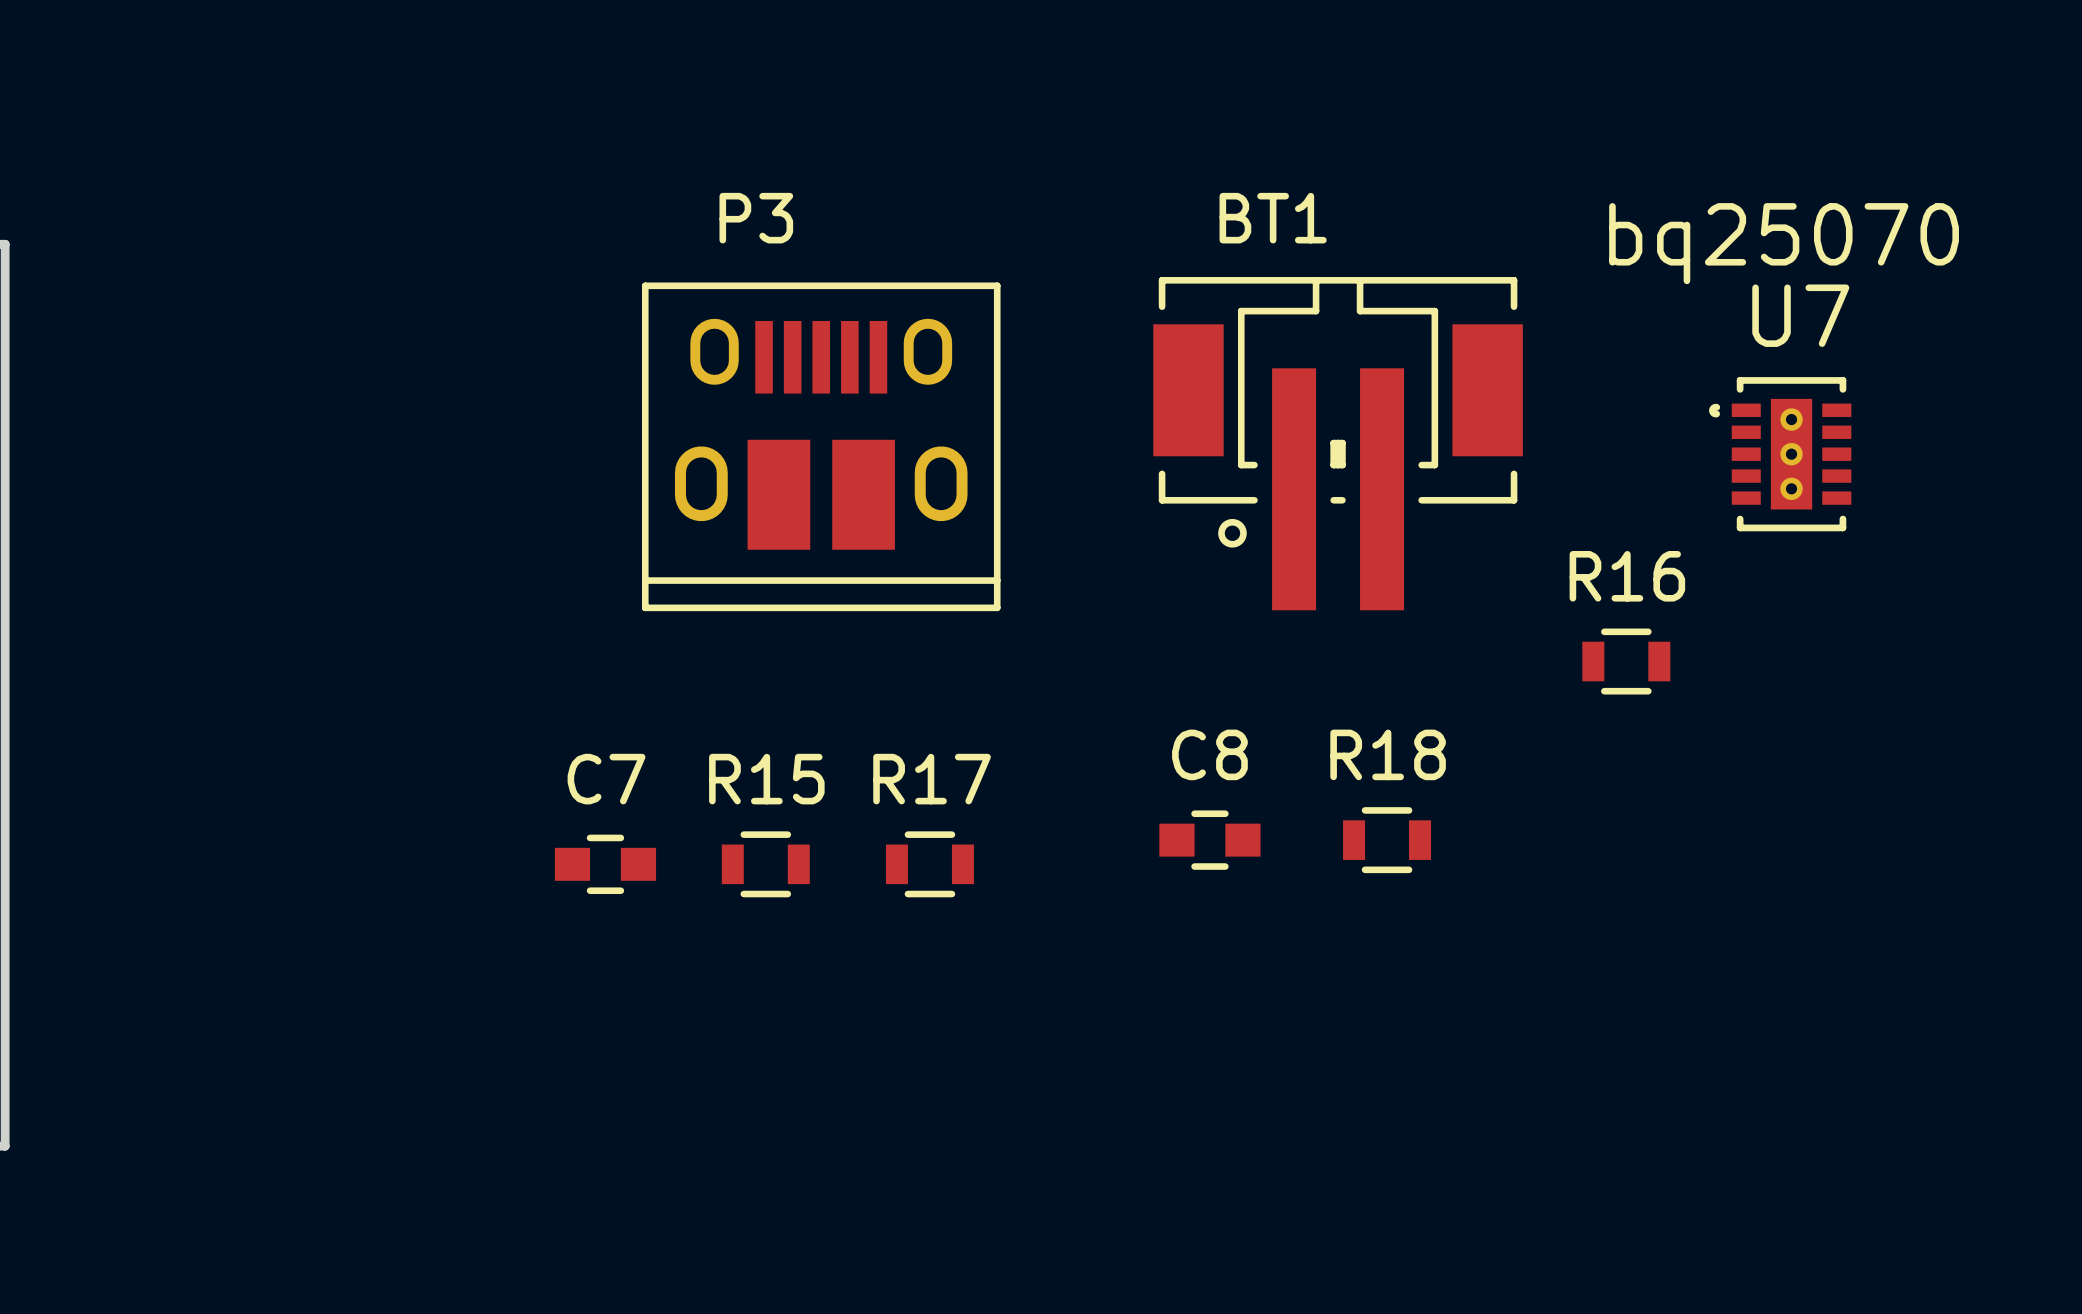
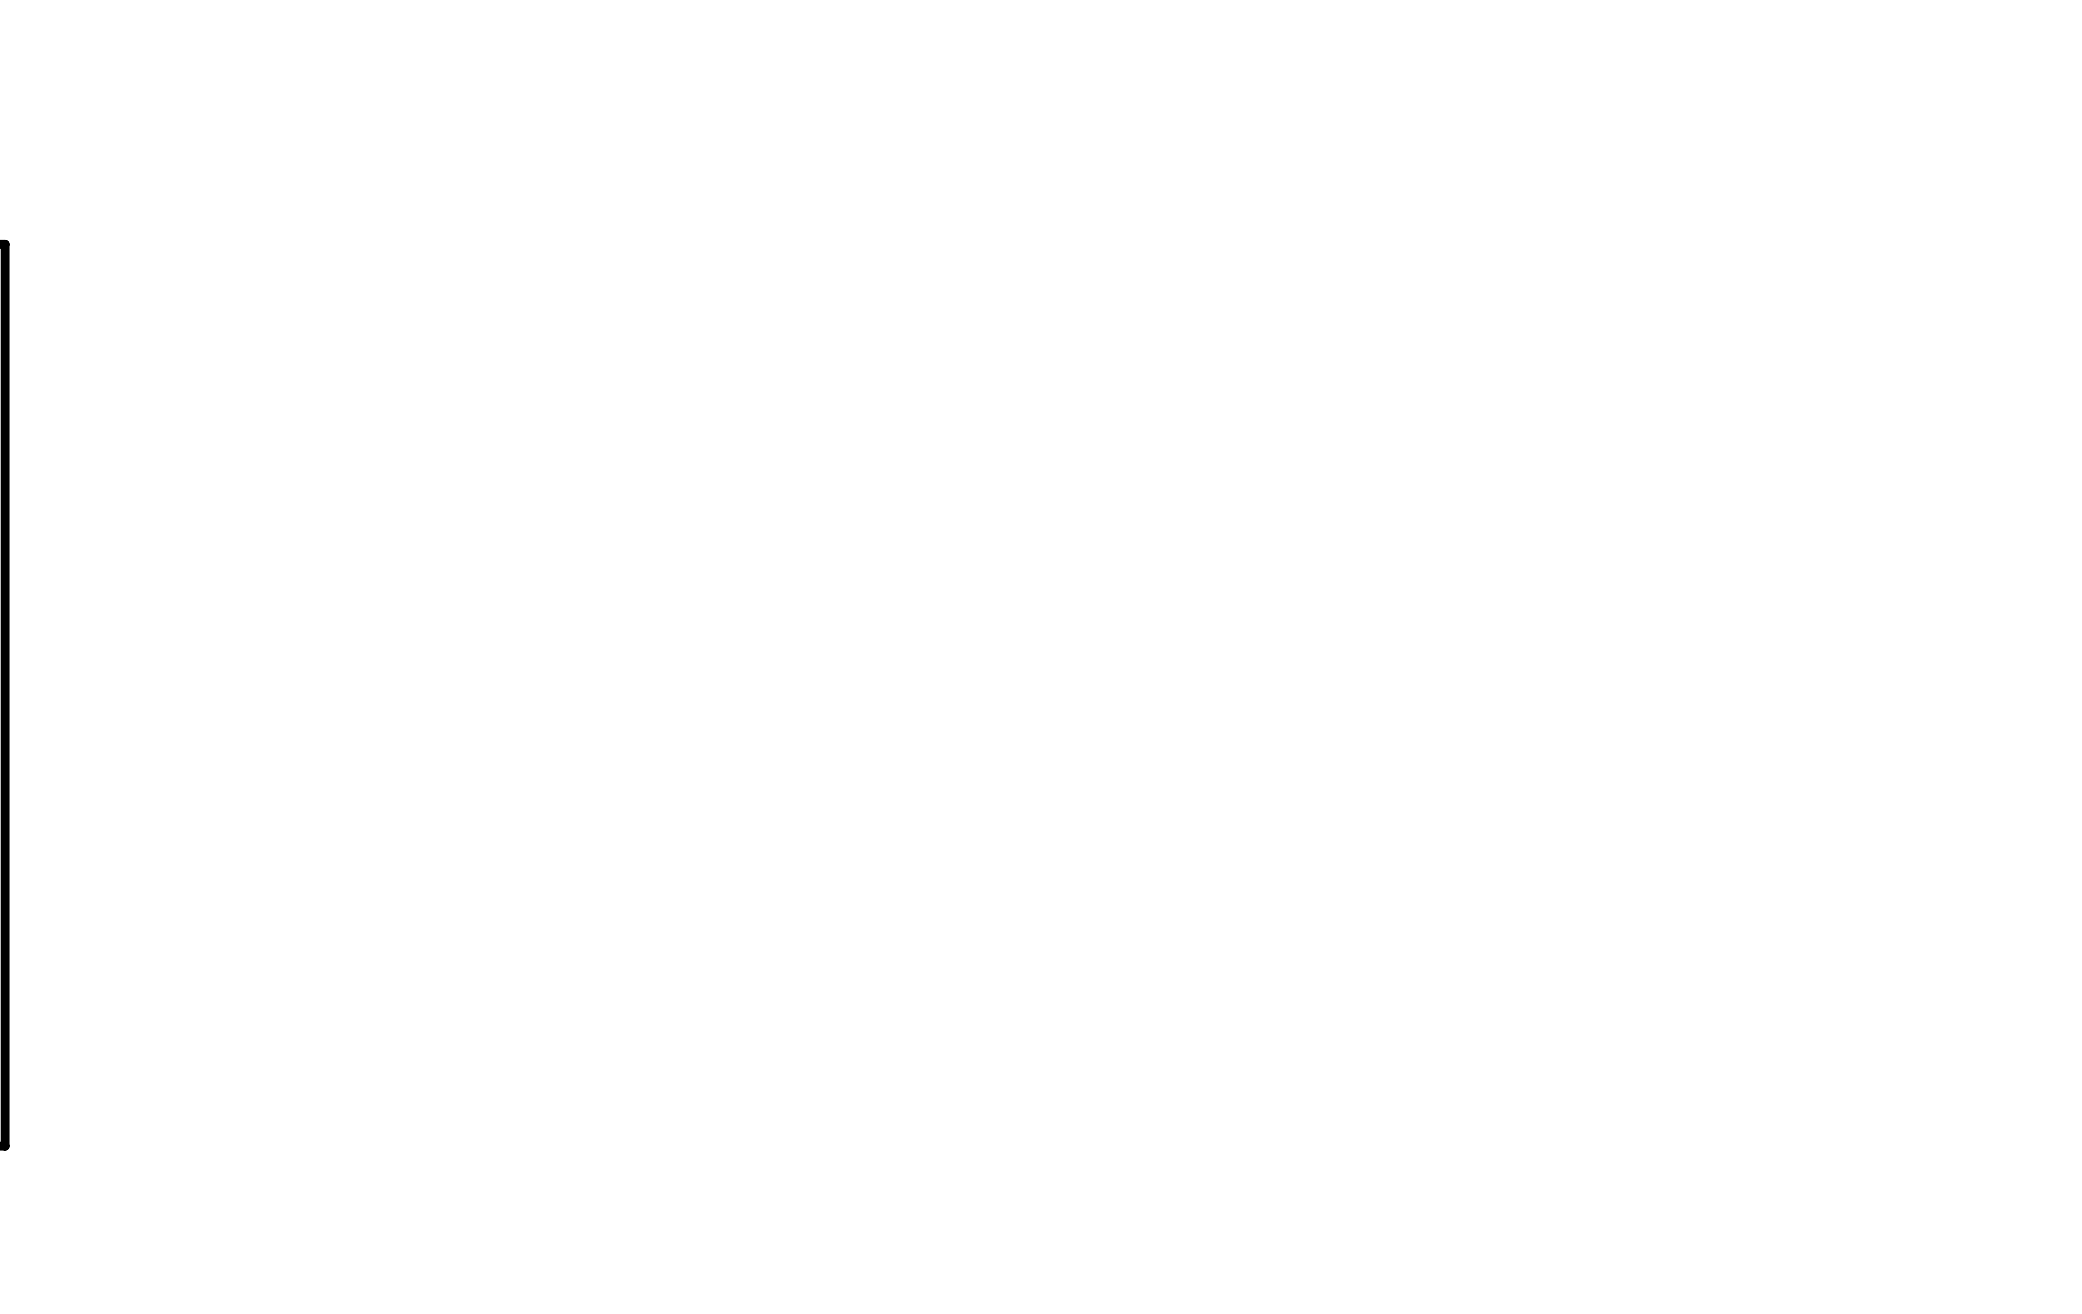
BT1: (1338, 443) -> none
P3: (821, 446) -> none
U7: bq25070 (1780, 454) -> none
R16: (1626, 661) -> none
C8: (1209, 840) -> none
R18: (1387, 840) -> none
C7: (605, 864) -> none
R15: (765, 864) -> none
R17: (929, 864) -> none

